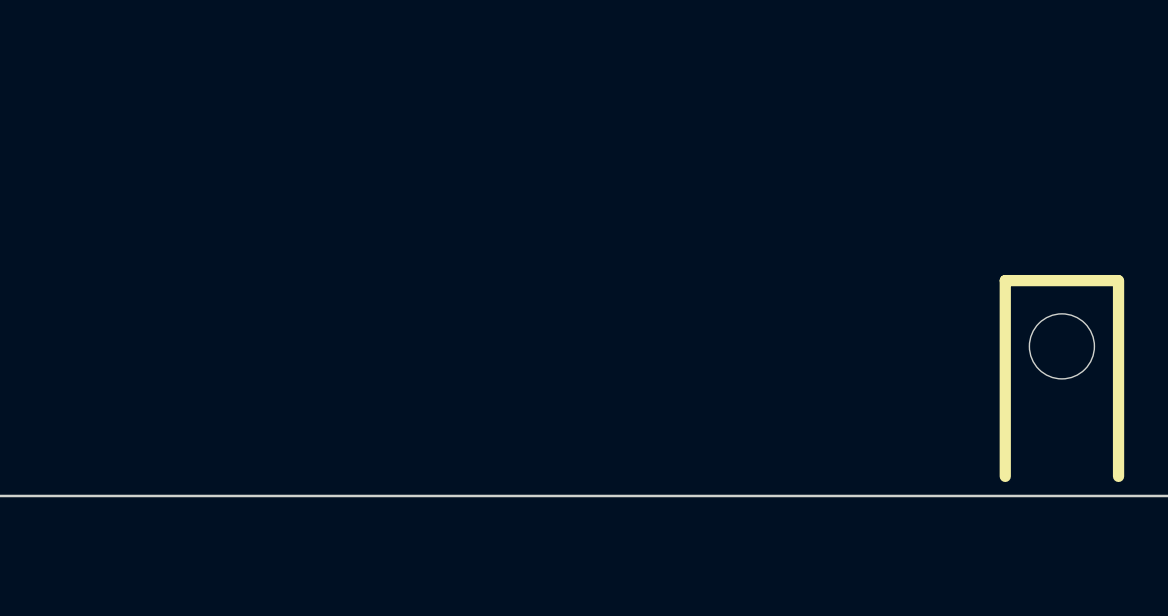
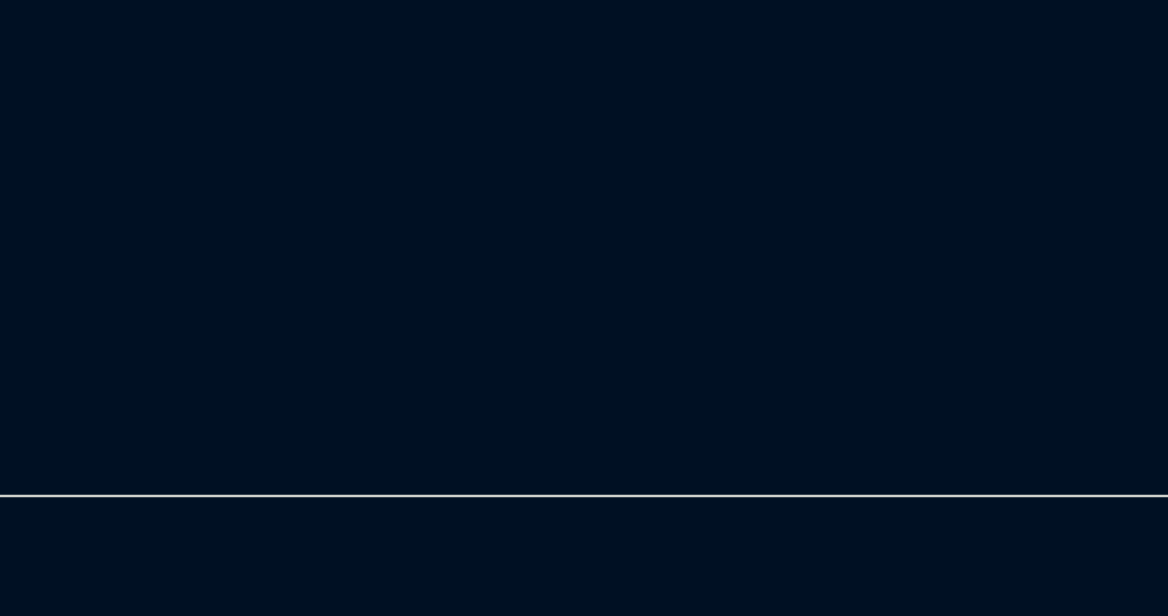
part: (1061, 378) -> none

